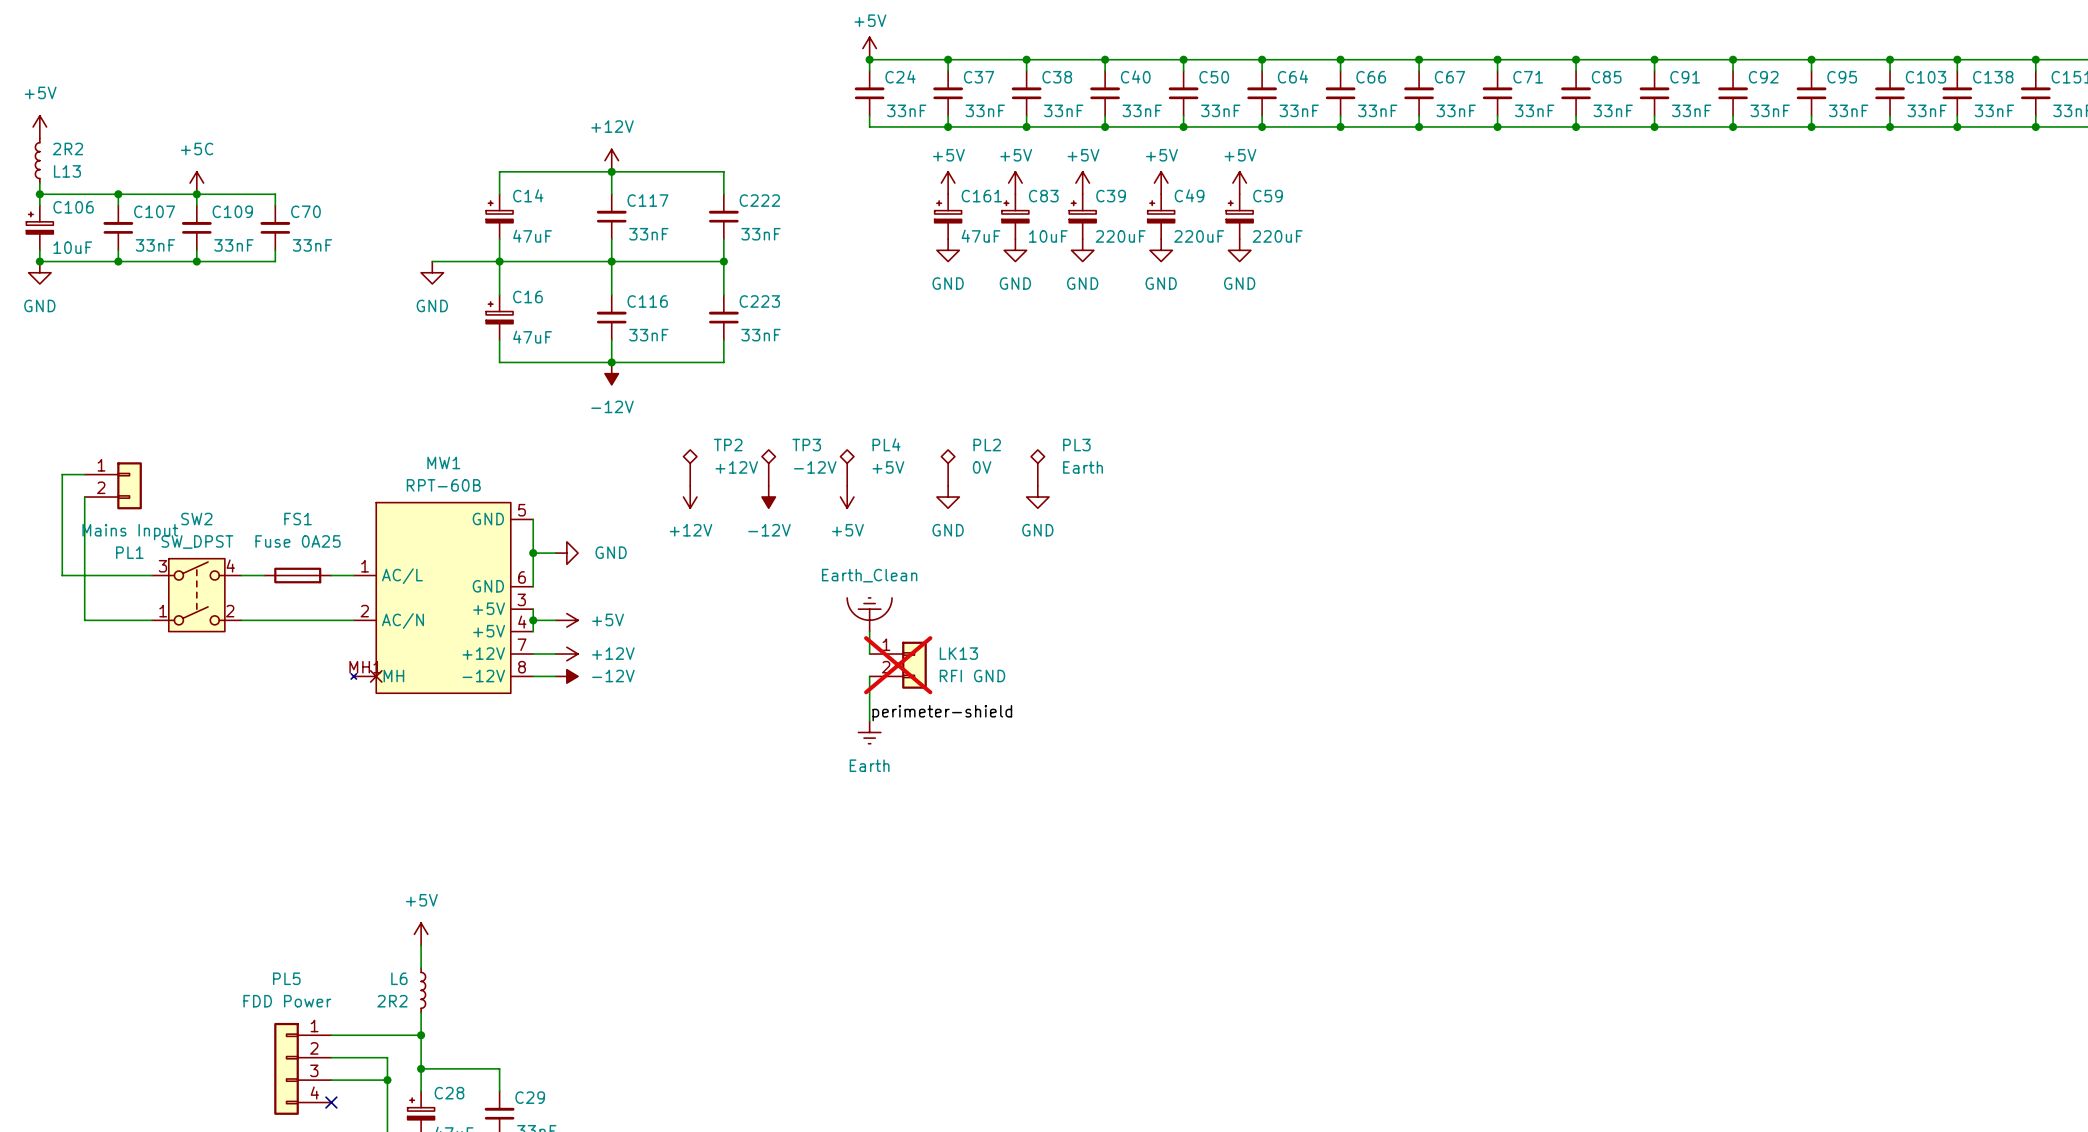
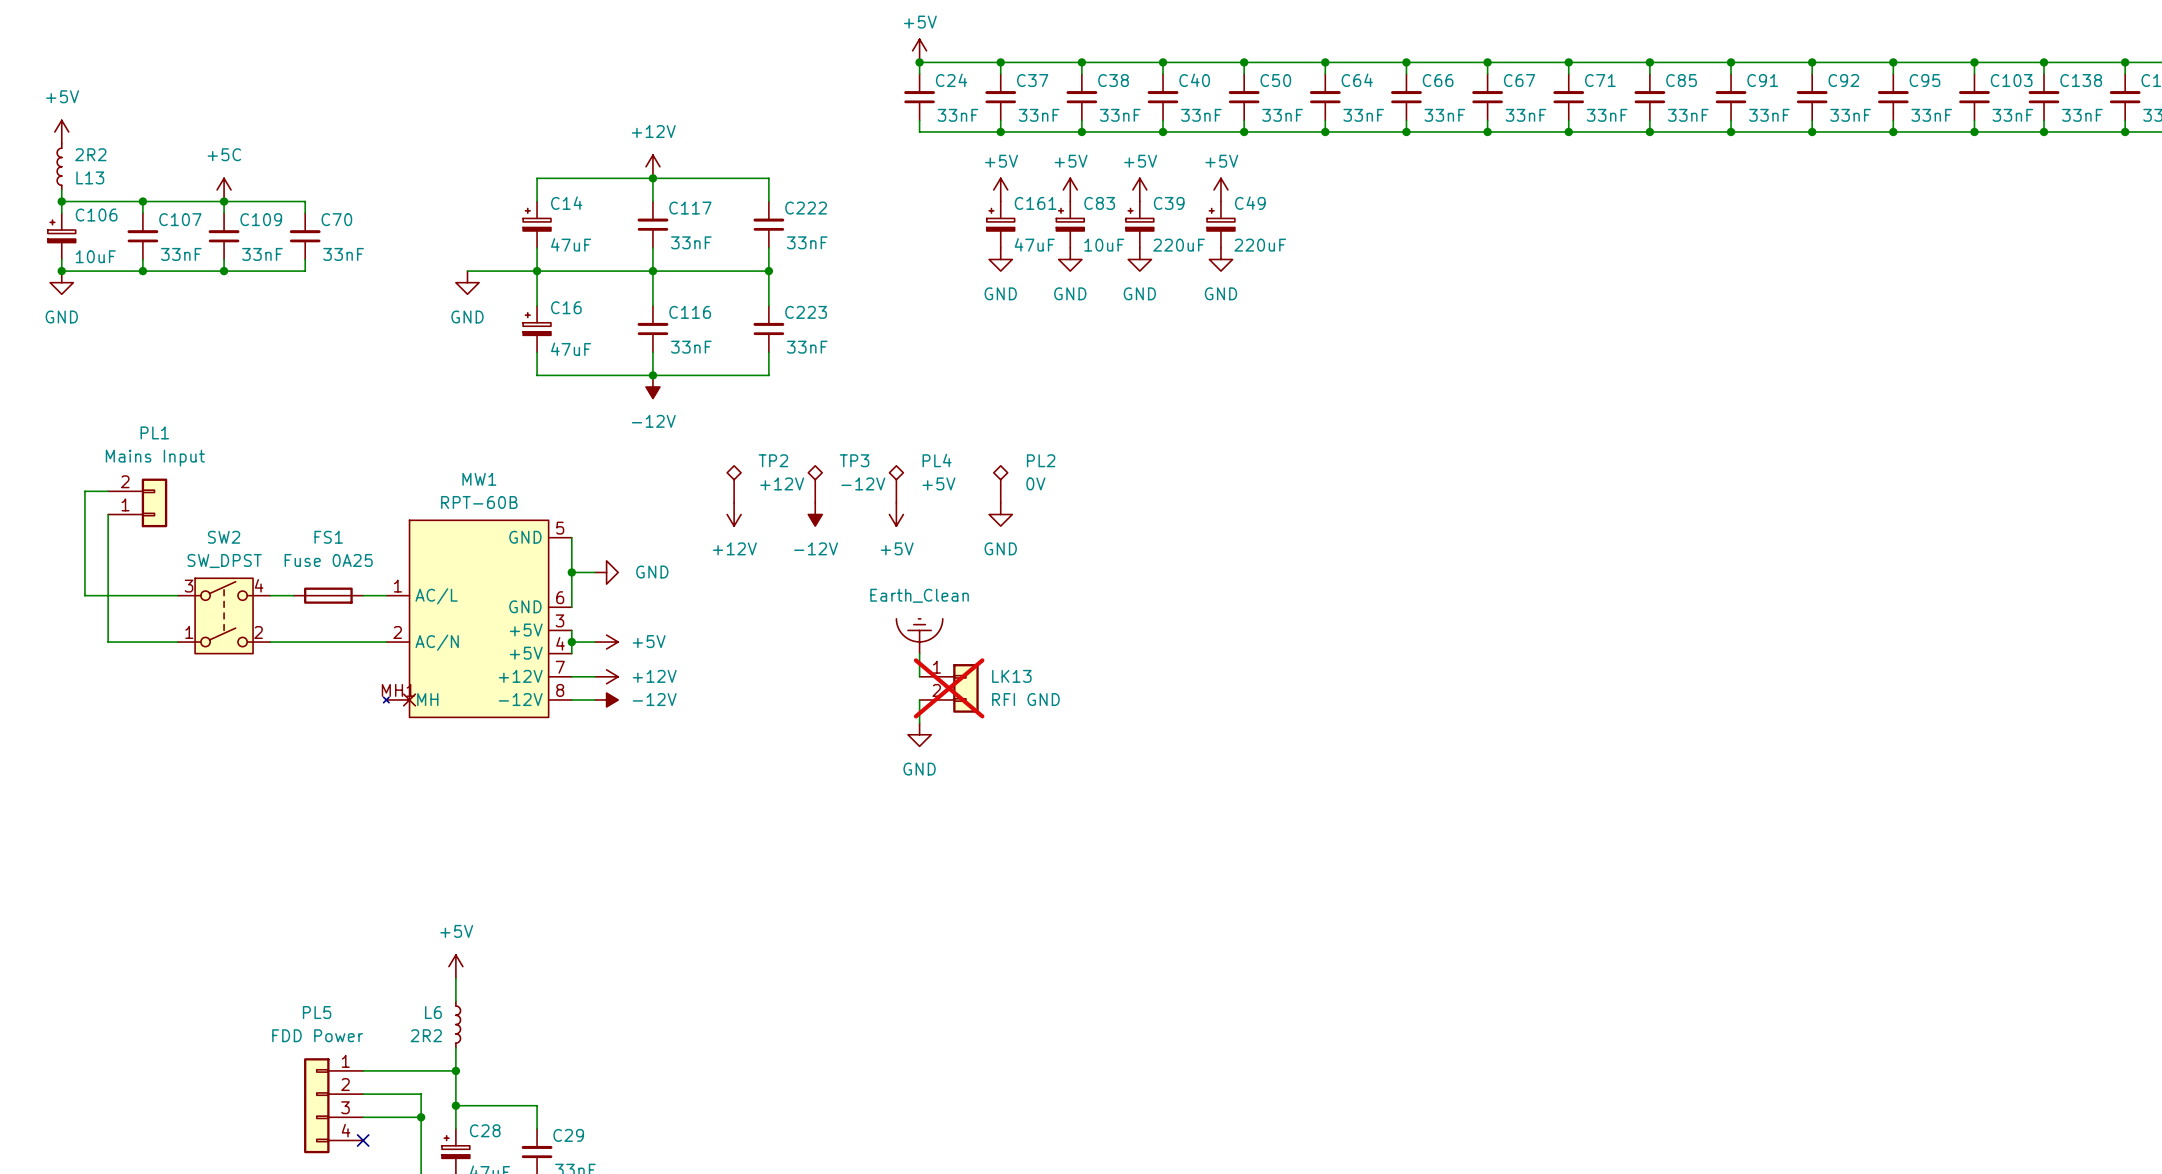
power symbol: +5V (1239, 183) -> none
C59: 220uF (1239, 216) -> none
power symbol: GND (1239, 250) -> none
PL3: Earth (1037, 467) -> none
PL1 flip: as is (129, 485) -> up-down (154, 502)
power symbol: GND (1037, 497) -> none
power symbol: none -> GND (919, 734)
label: perimeter-shield (942, 713) -> none
power symbol: Earth (869, 732) -> none

